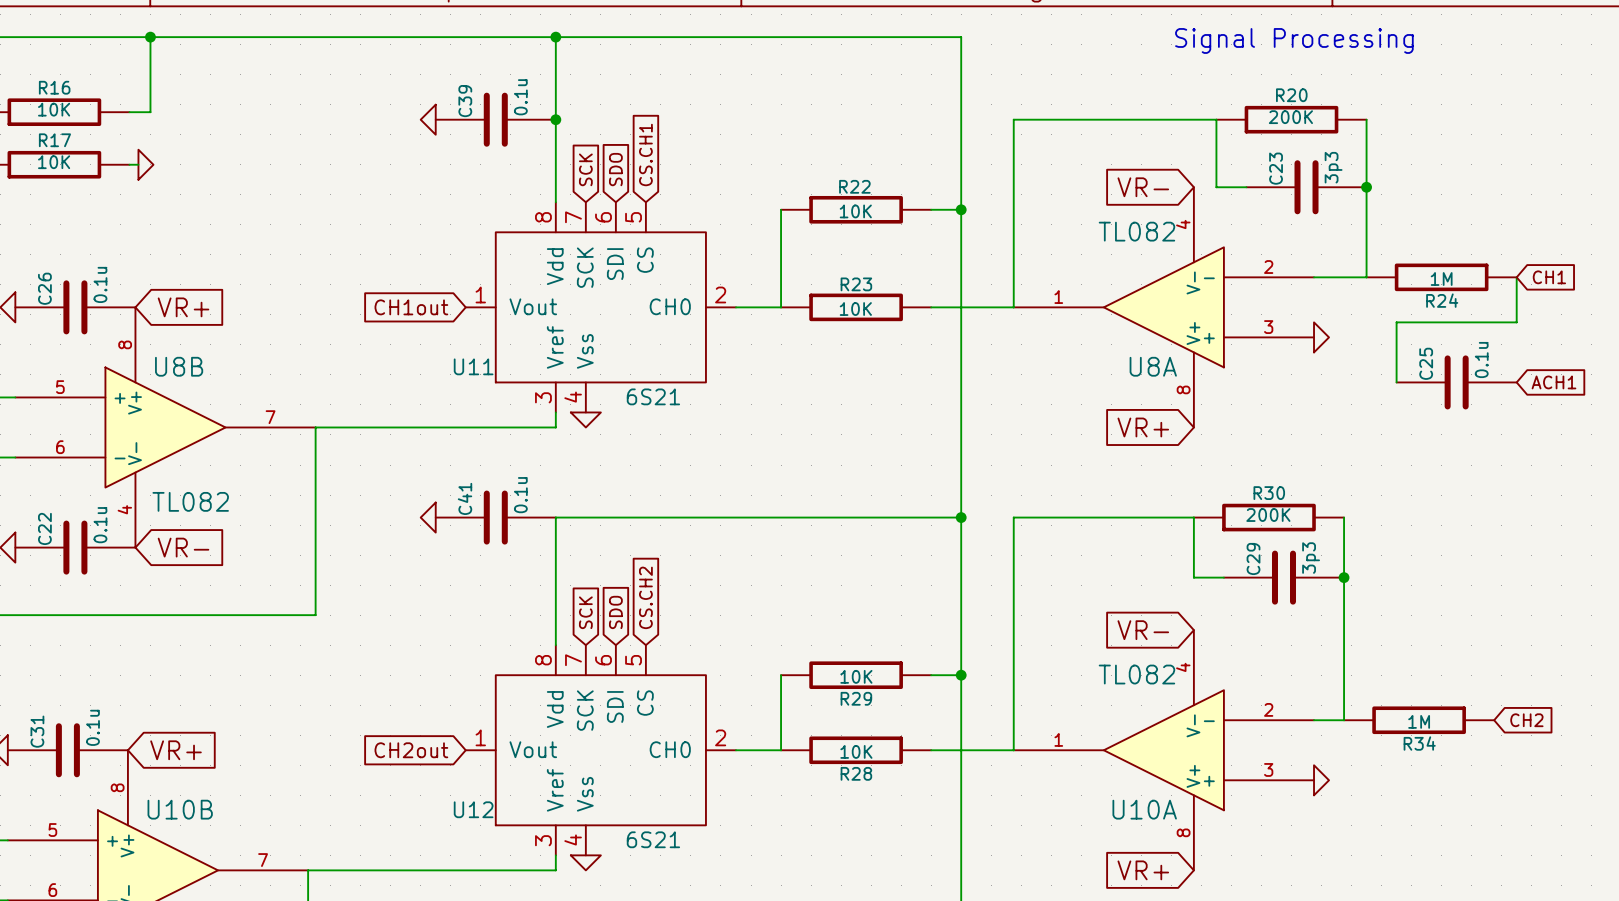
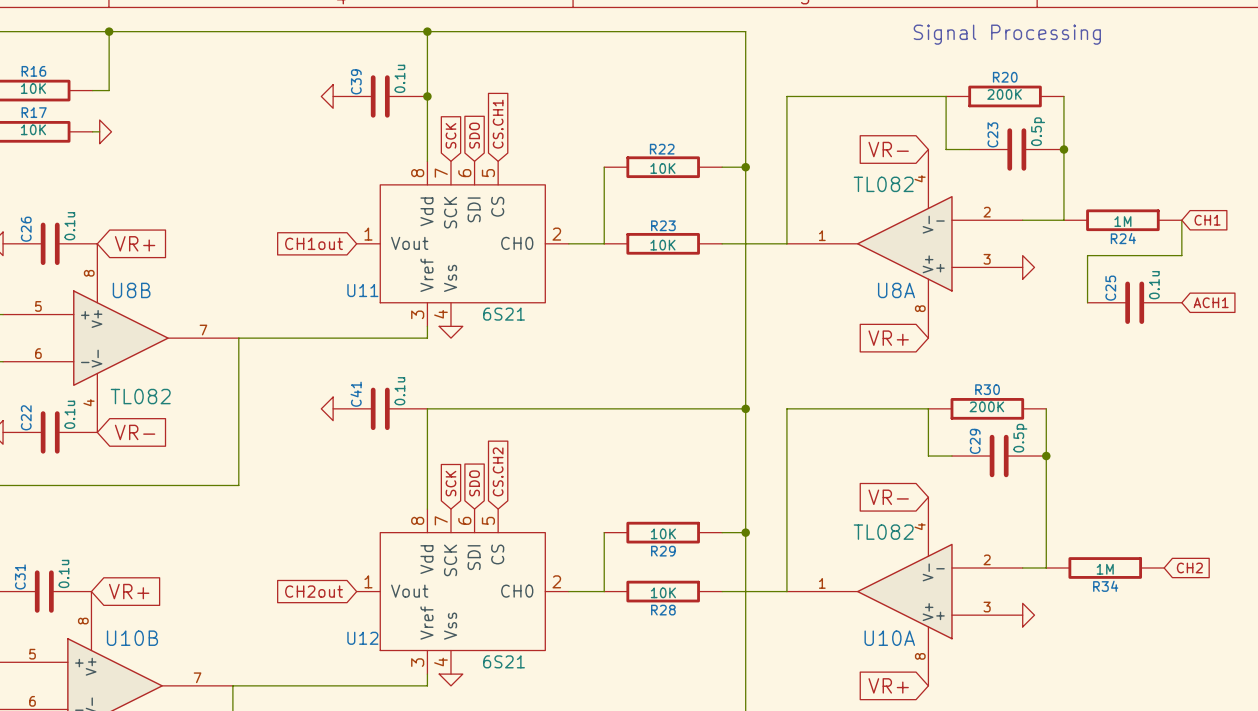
C23 value: 3p3 (1333, 167) -> 0.5p (1038, 131)
C29 value: 3p3 (1311, 558) -> 0.5p (1020, 438)

